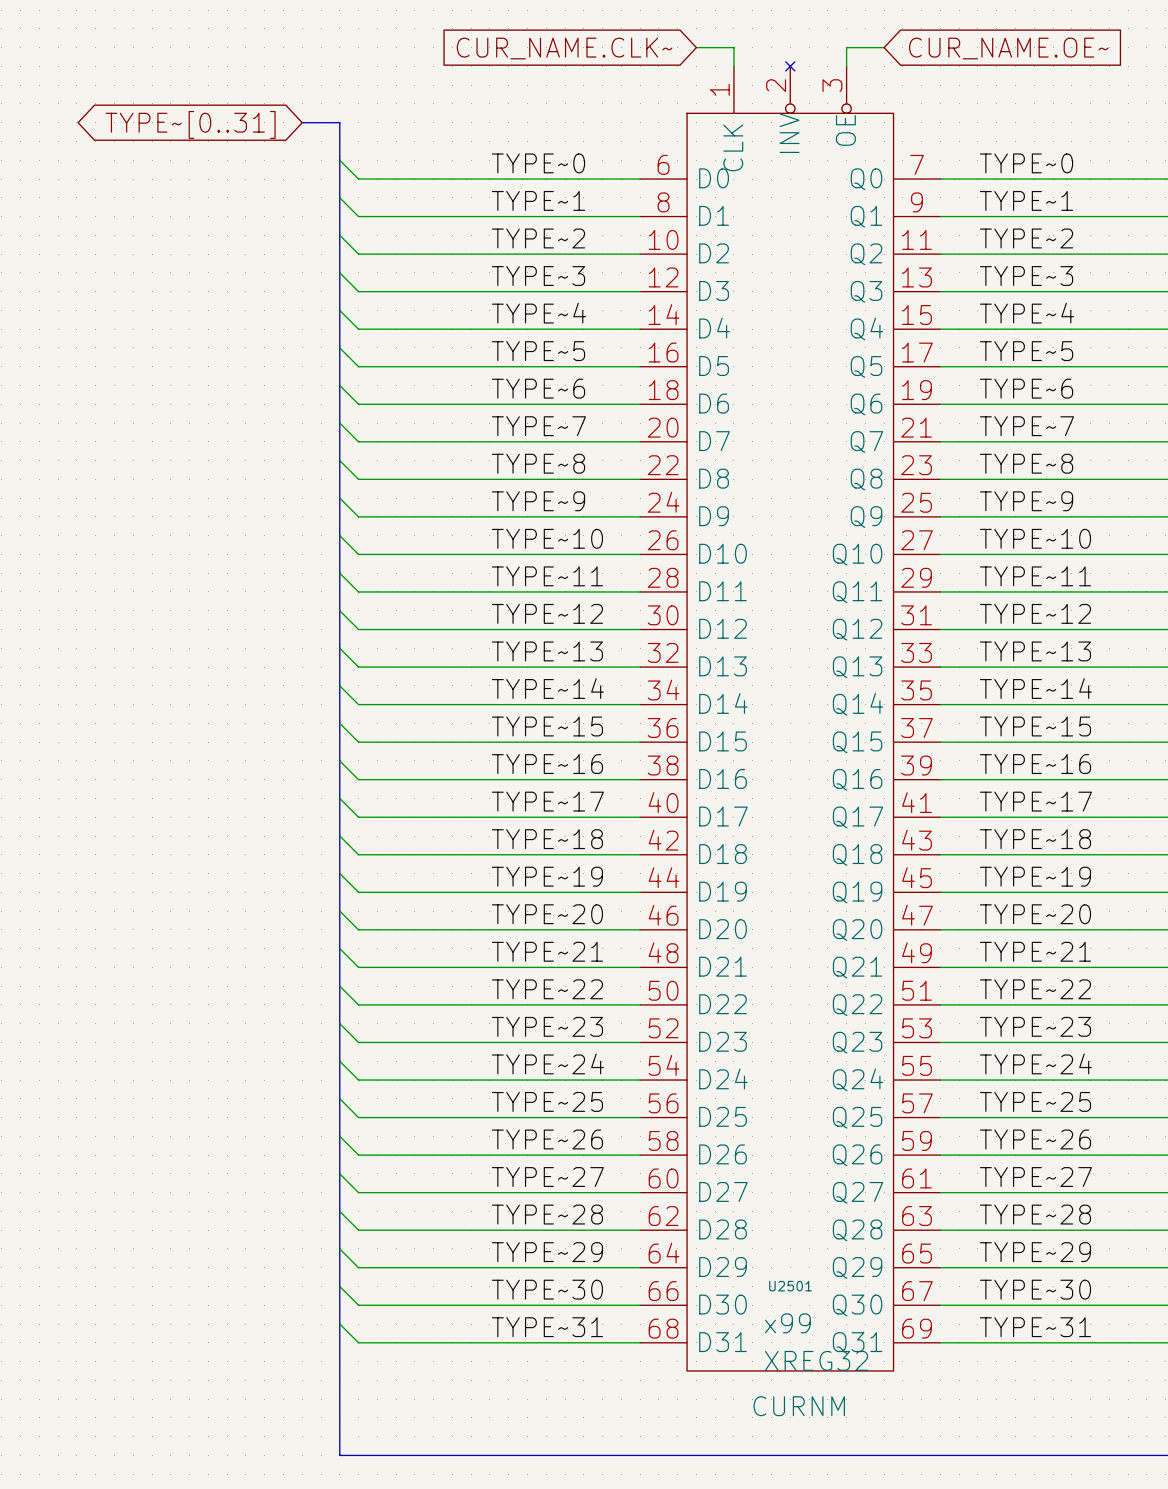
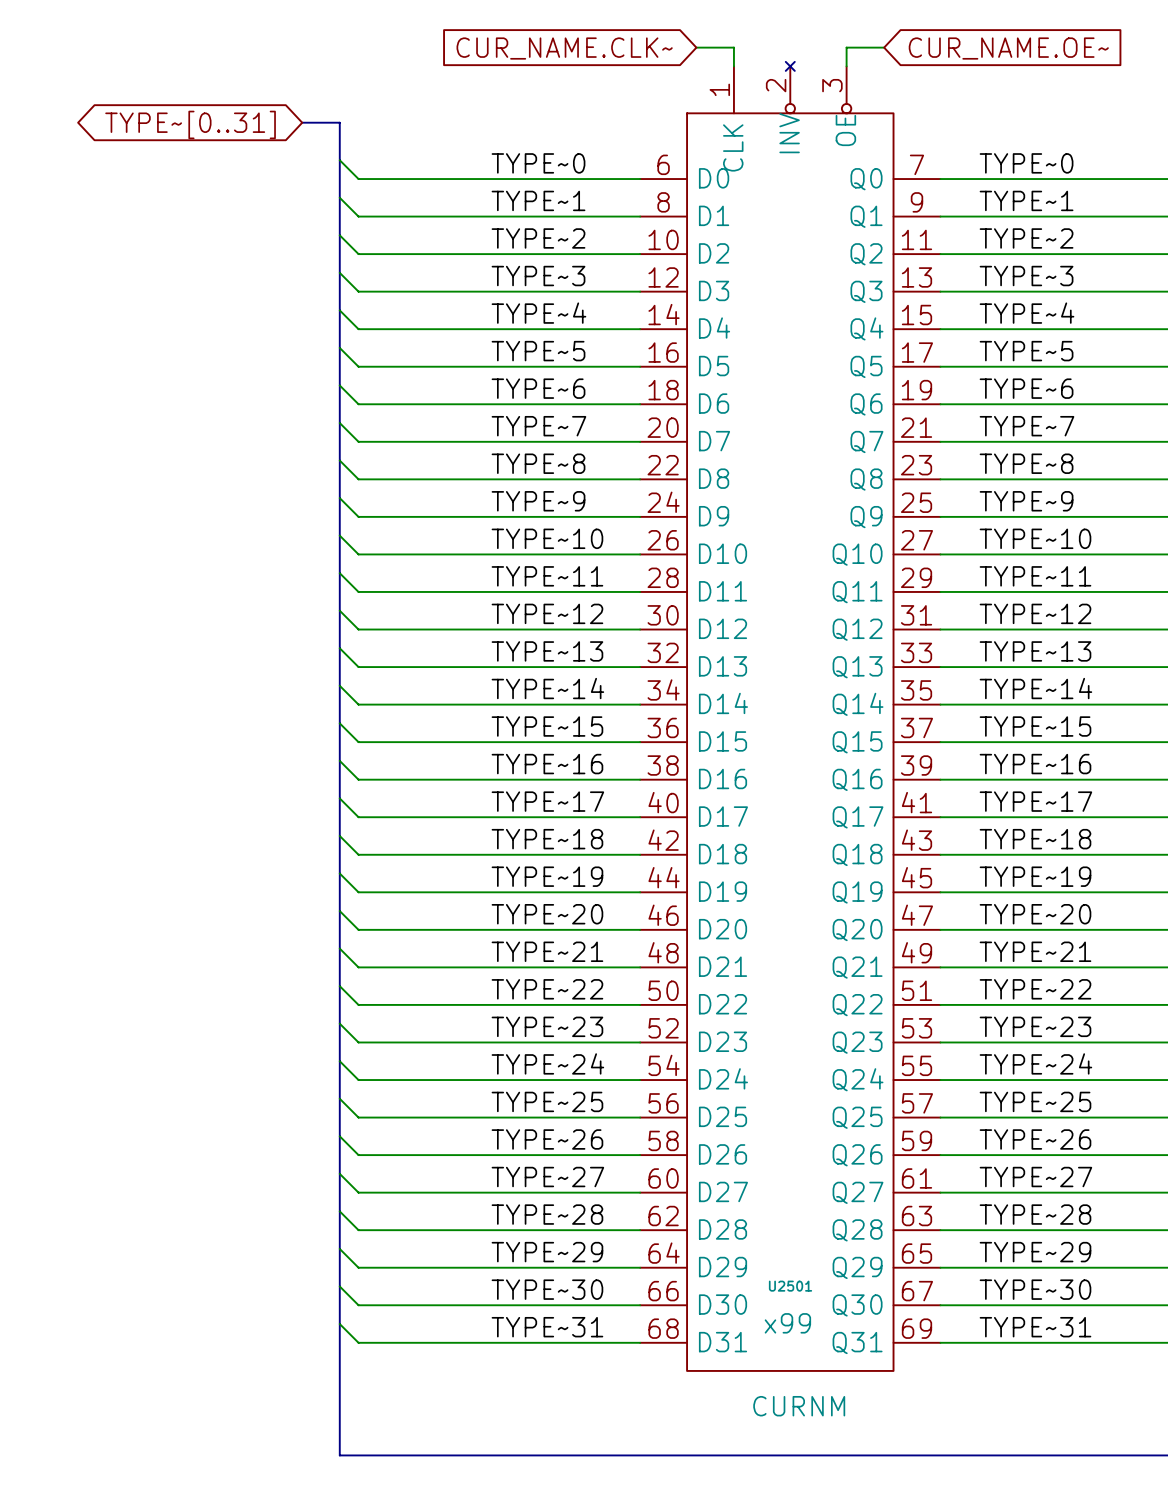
U2501 value: XREG32 (816, 1360) -> none

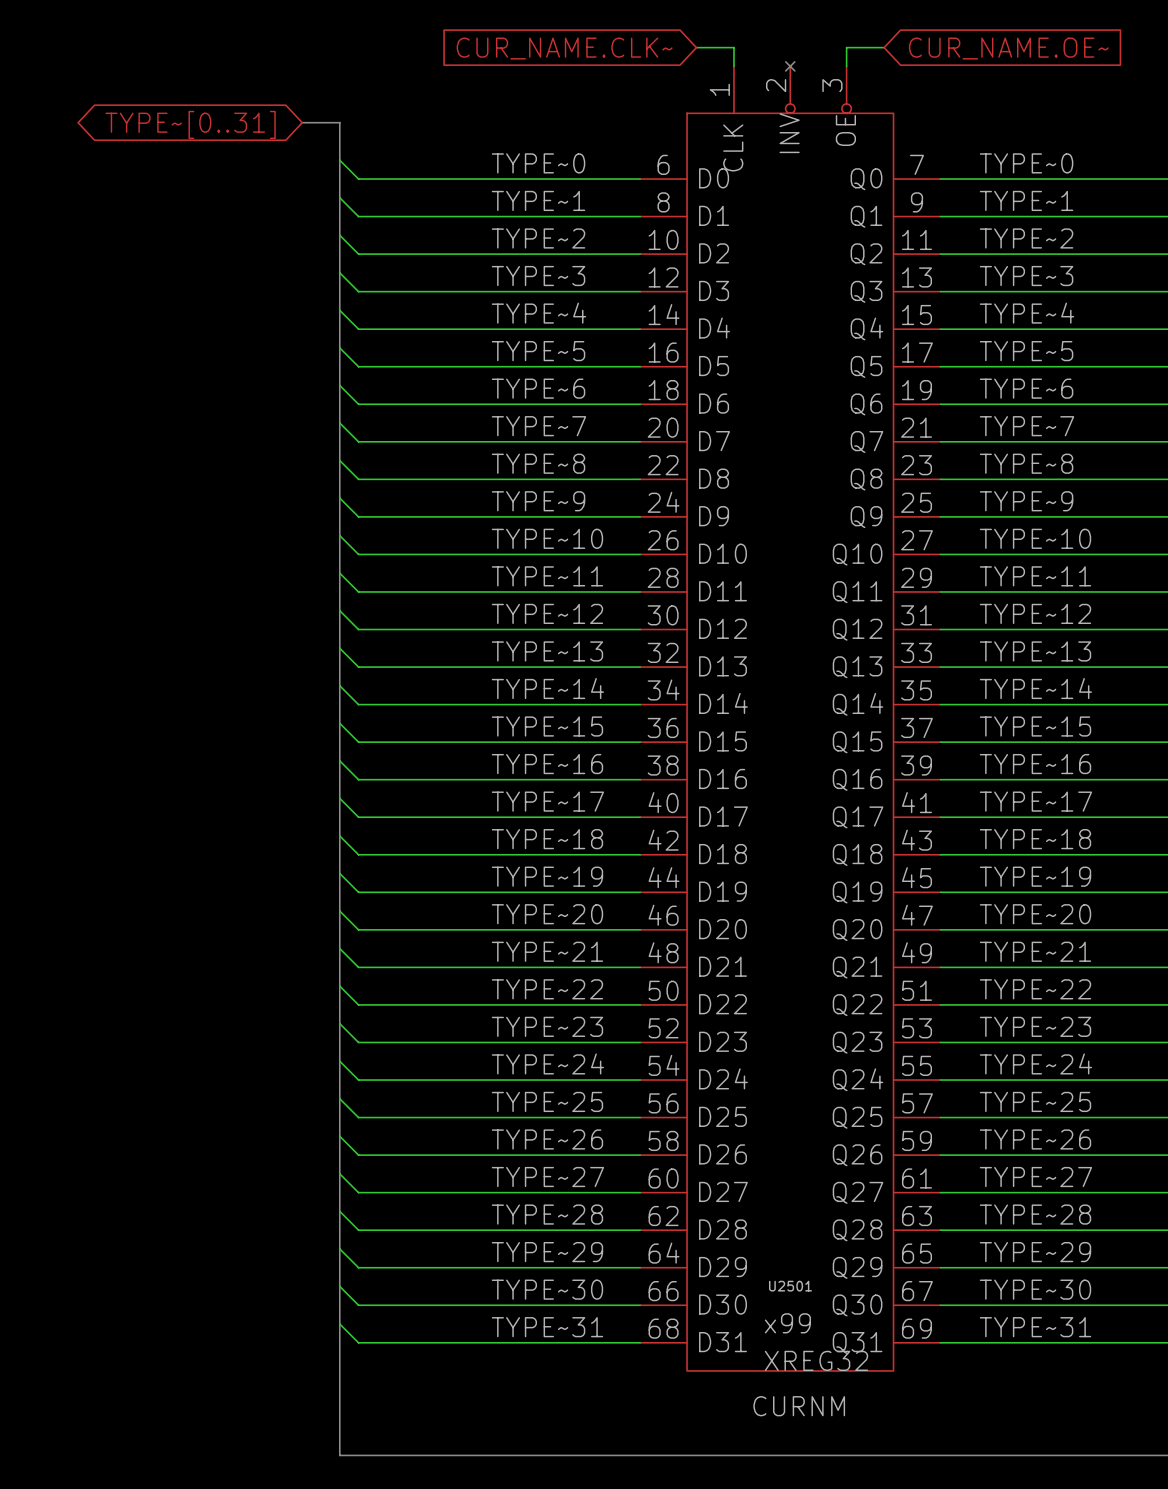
U2501 value: none -> XREG32 (816, 1360)

